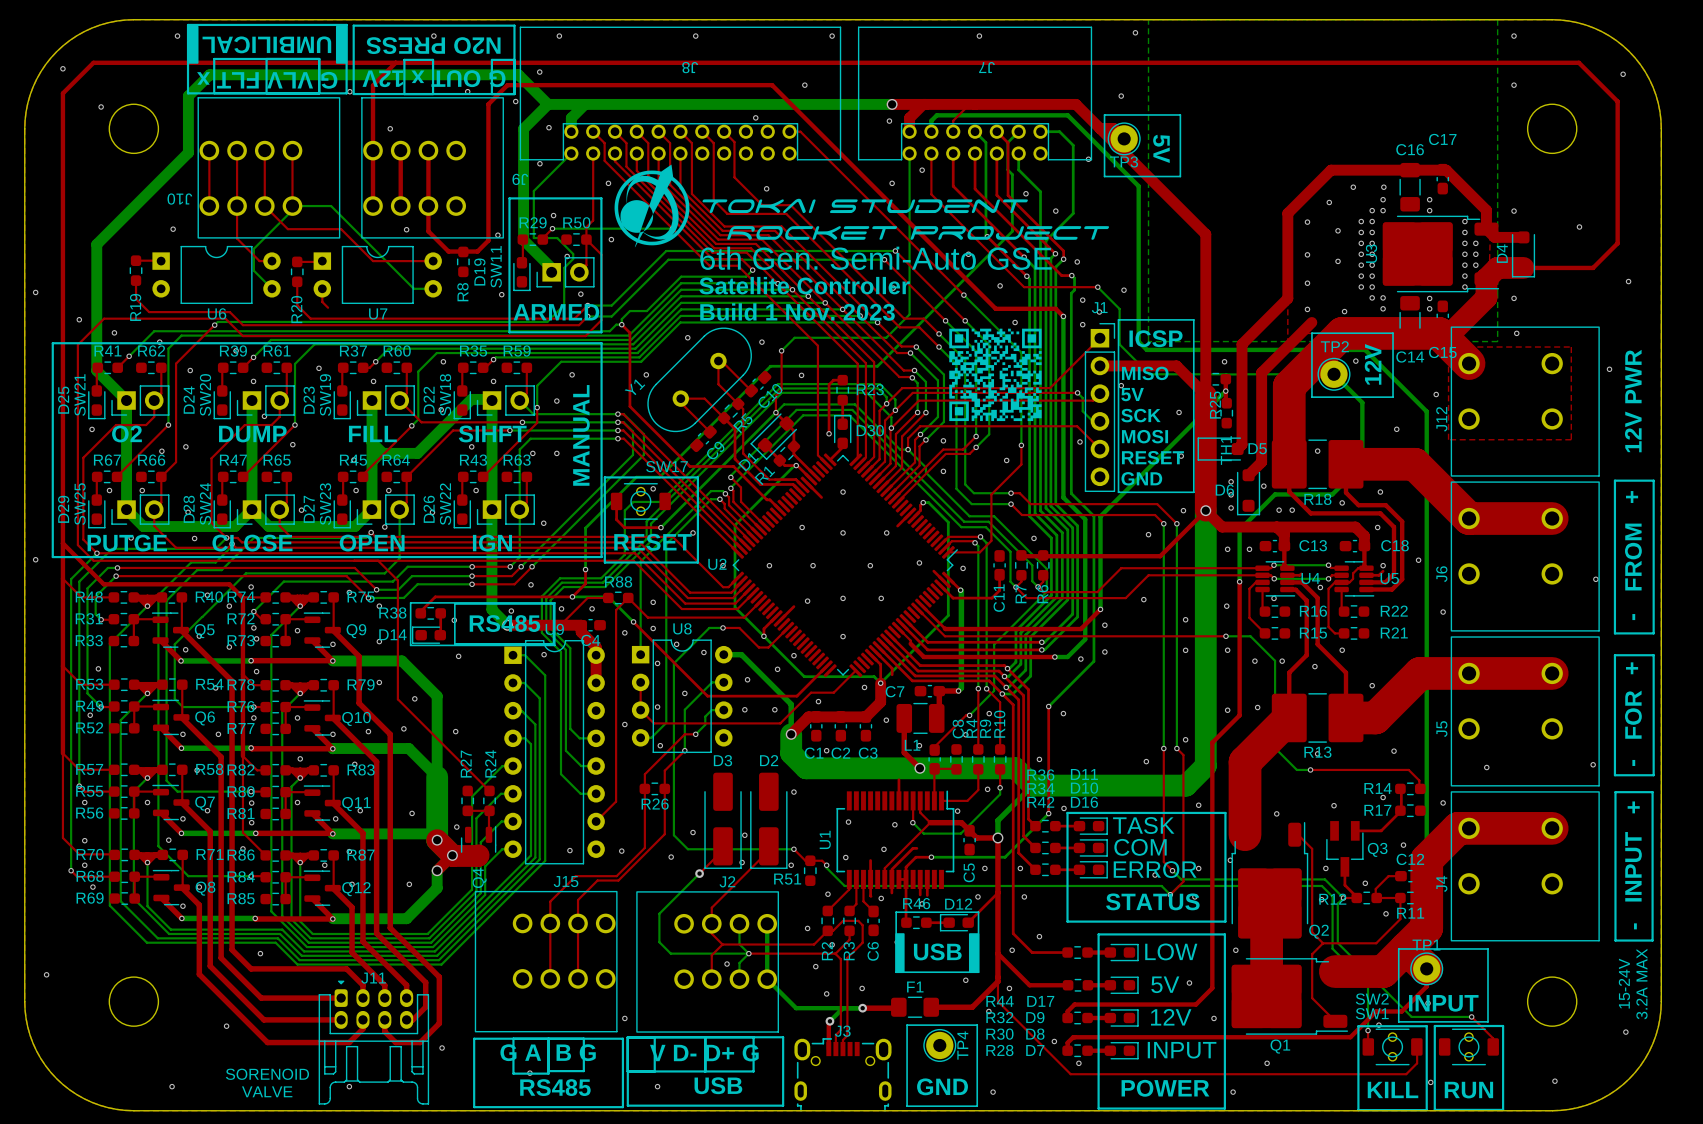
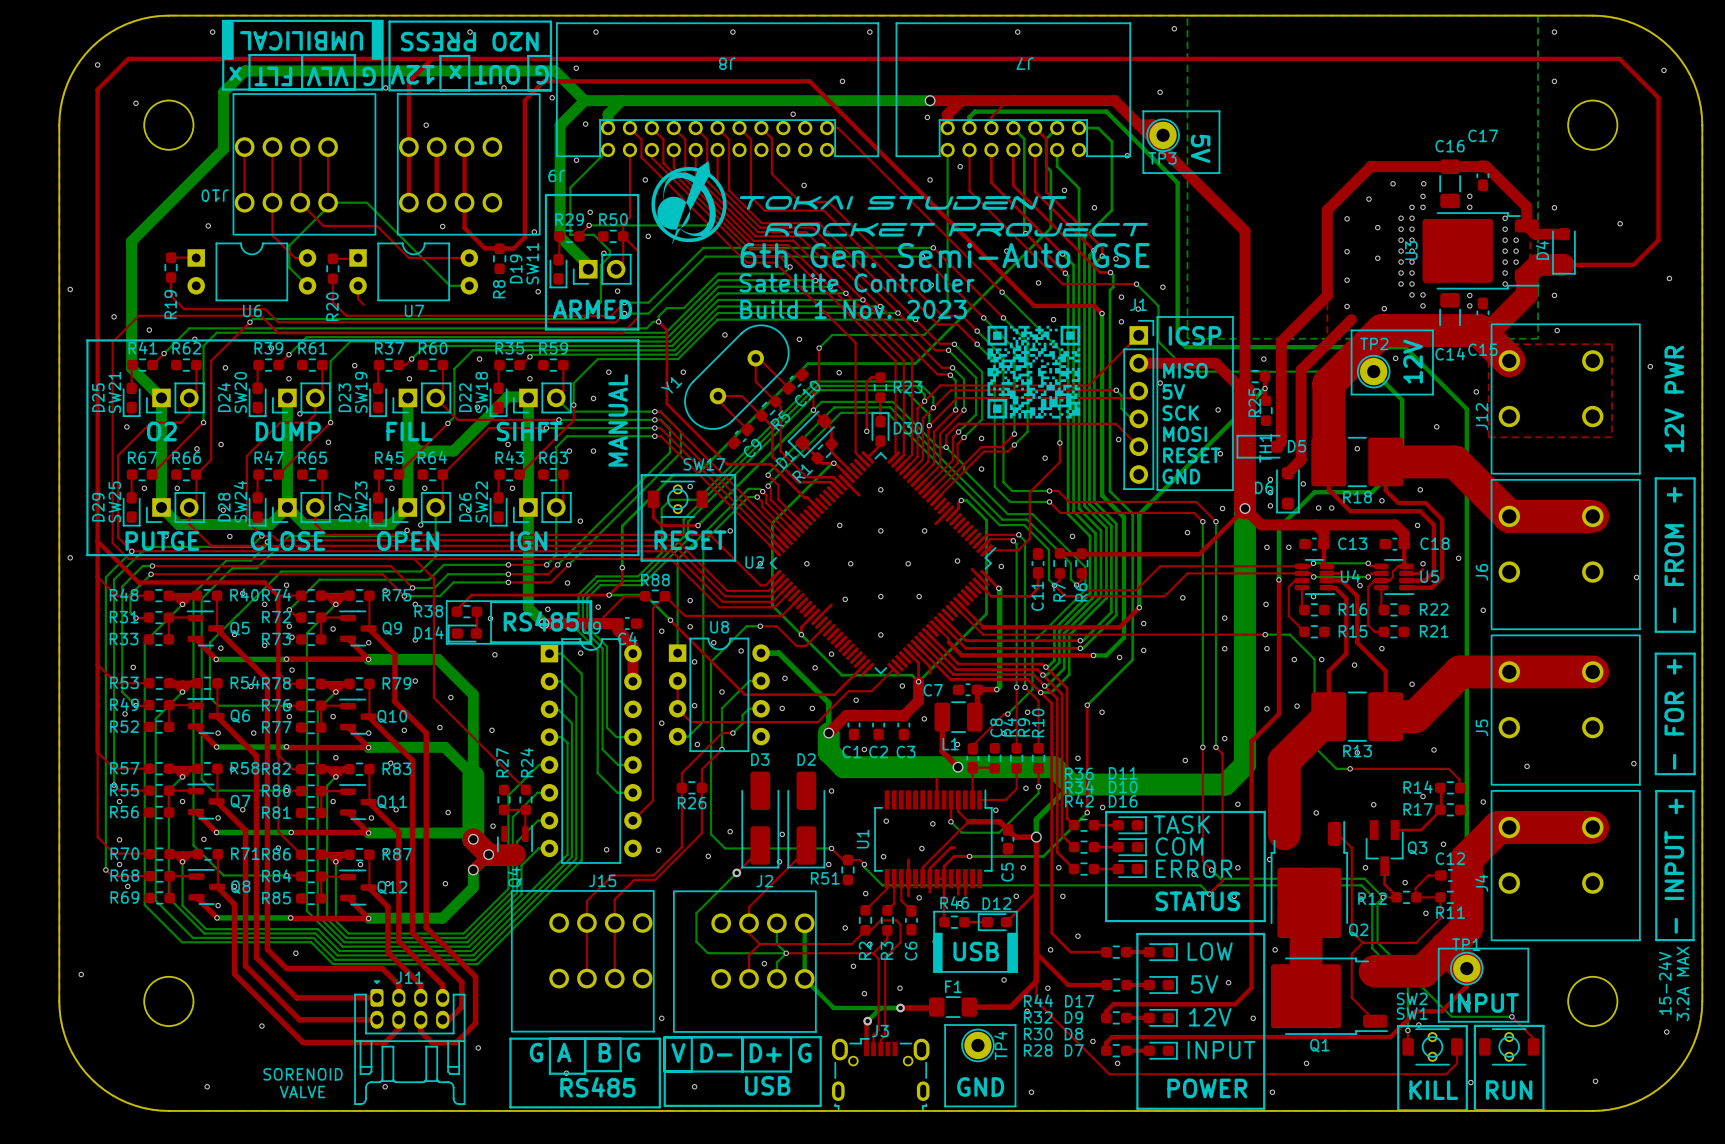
via: (592, 608) -> none
via: (251, 803) -> none
via: (251, 822) -> none

